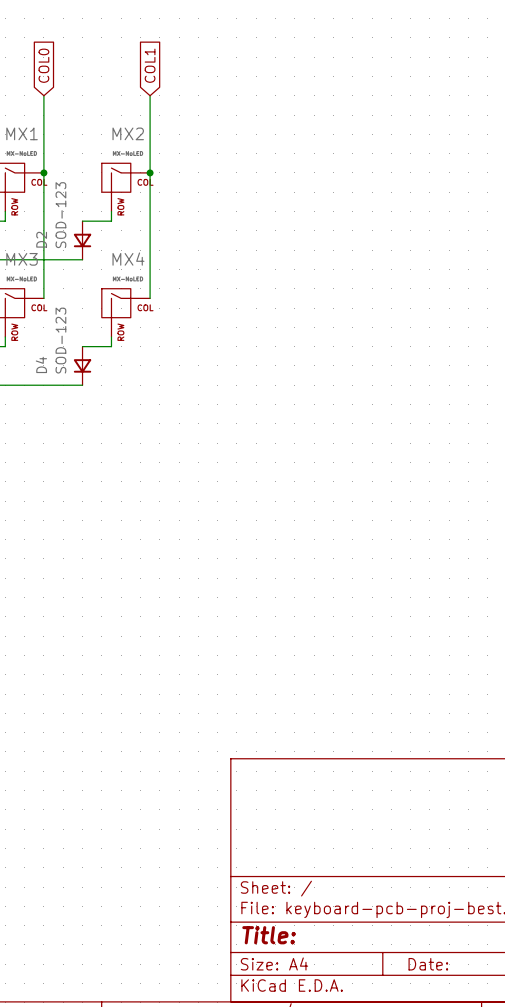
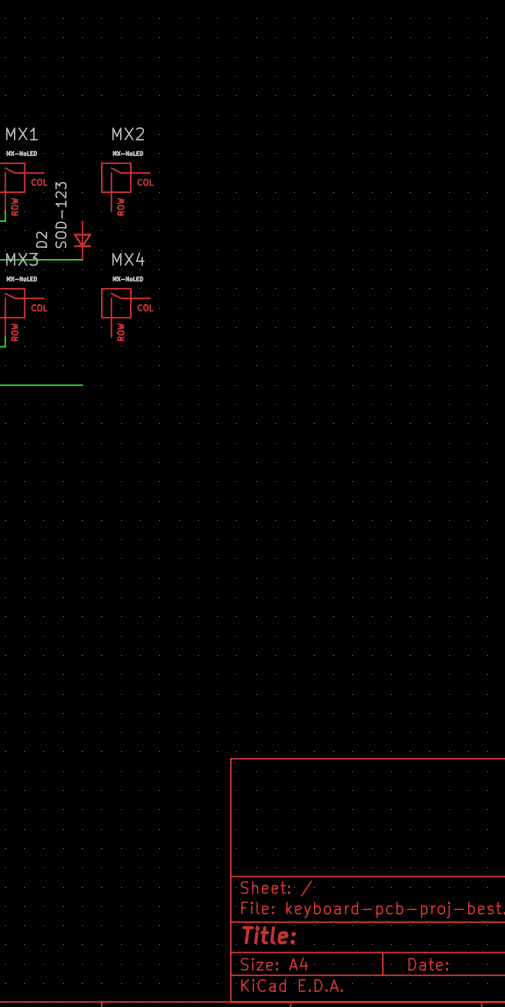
global label: COL0 (43, 65) -> none
global label: COL1 (150, 65) -> none
wire: (43, 95) (43, 298) -> none
wire: (150, 95) (150, 298) -> none
junction: (43, 172) -> none
junction: (150, 172) -> none
wire: (111, 211) (111, 221) (82, 221) -> none
wire: (111, 336) (111, 346) (82, 346) -> none
D4: SOD-123 (82, 365) -> none

